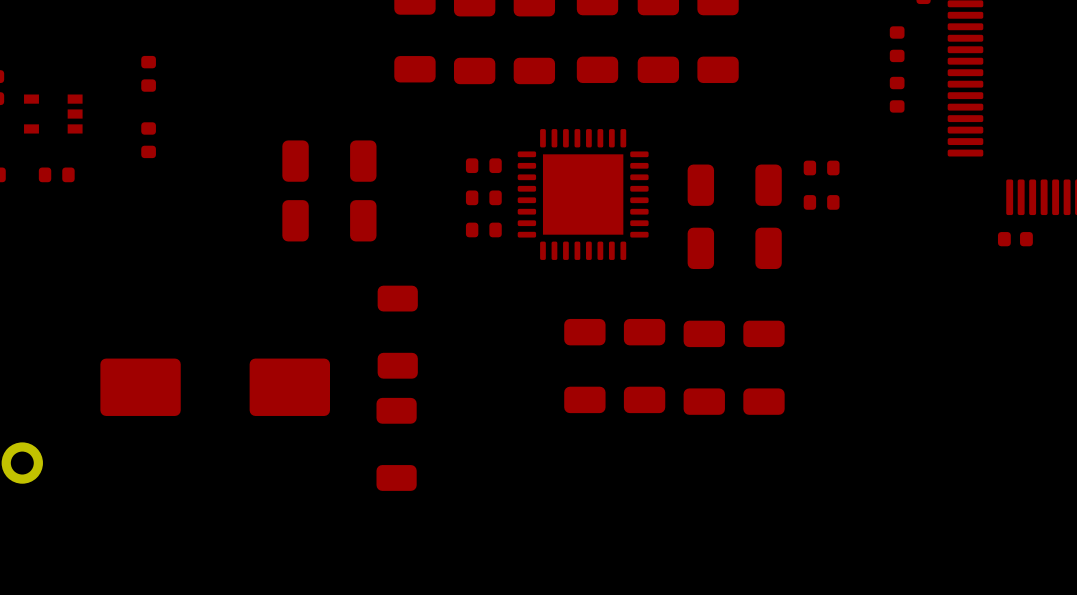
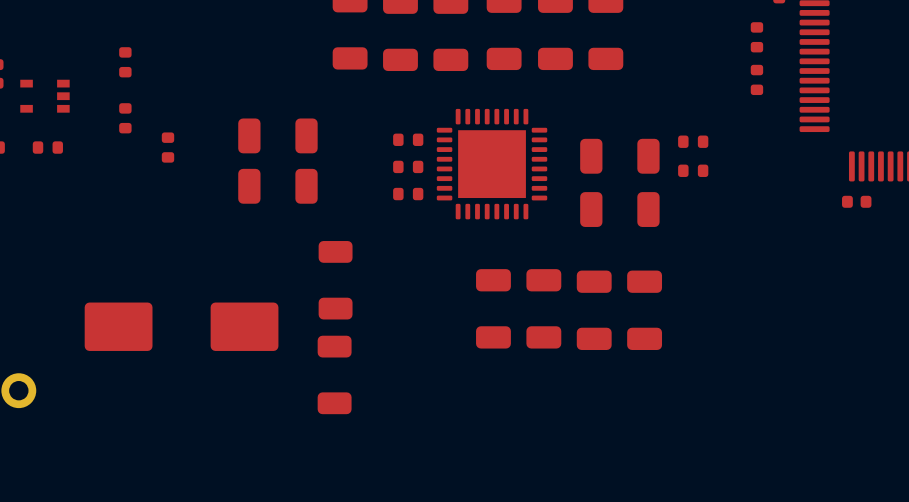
part: none -> (167, 147)

